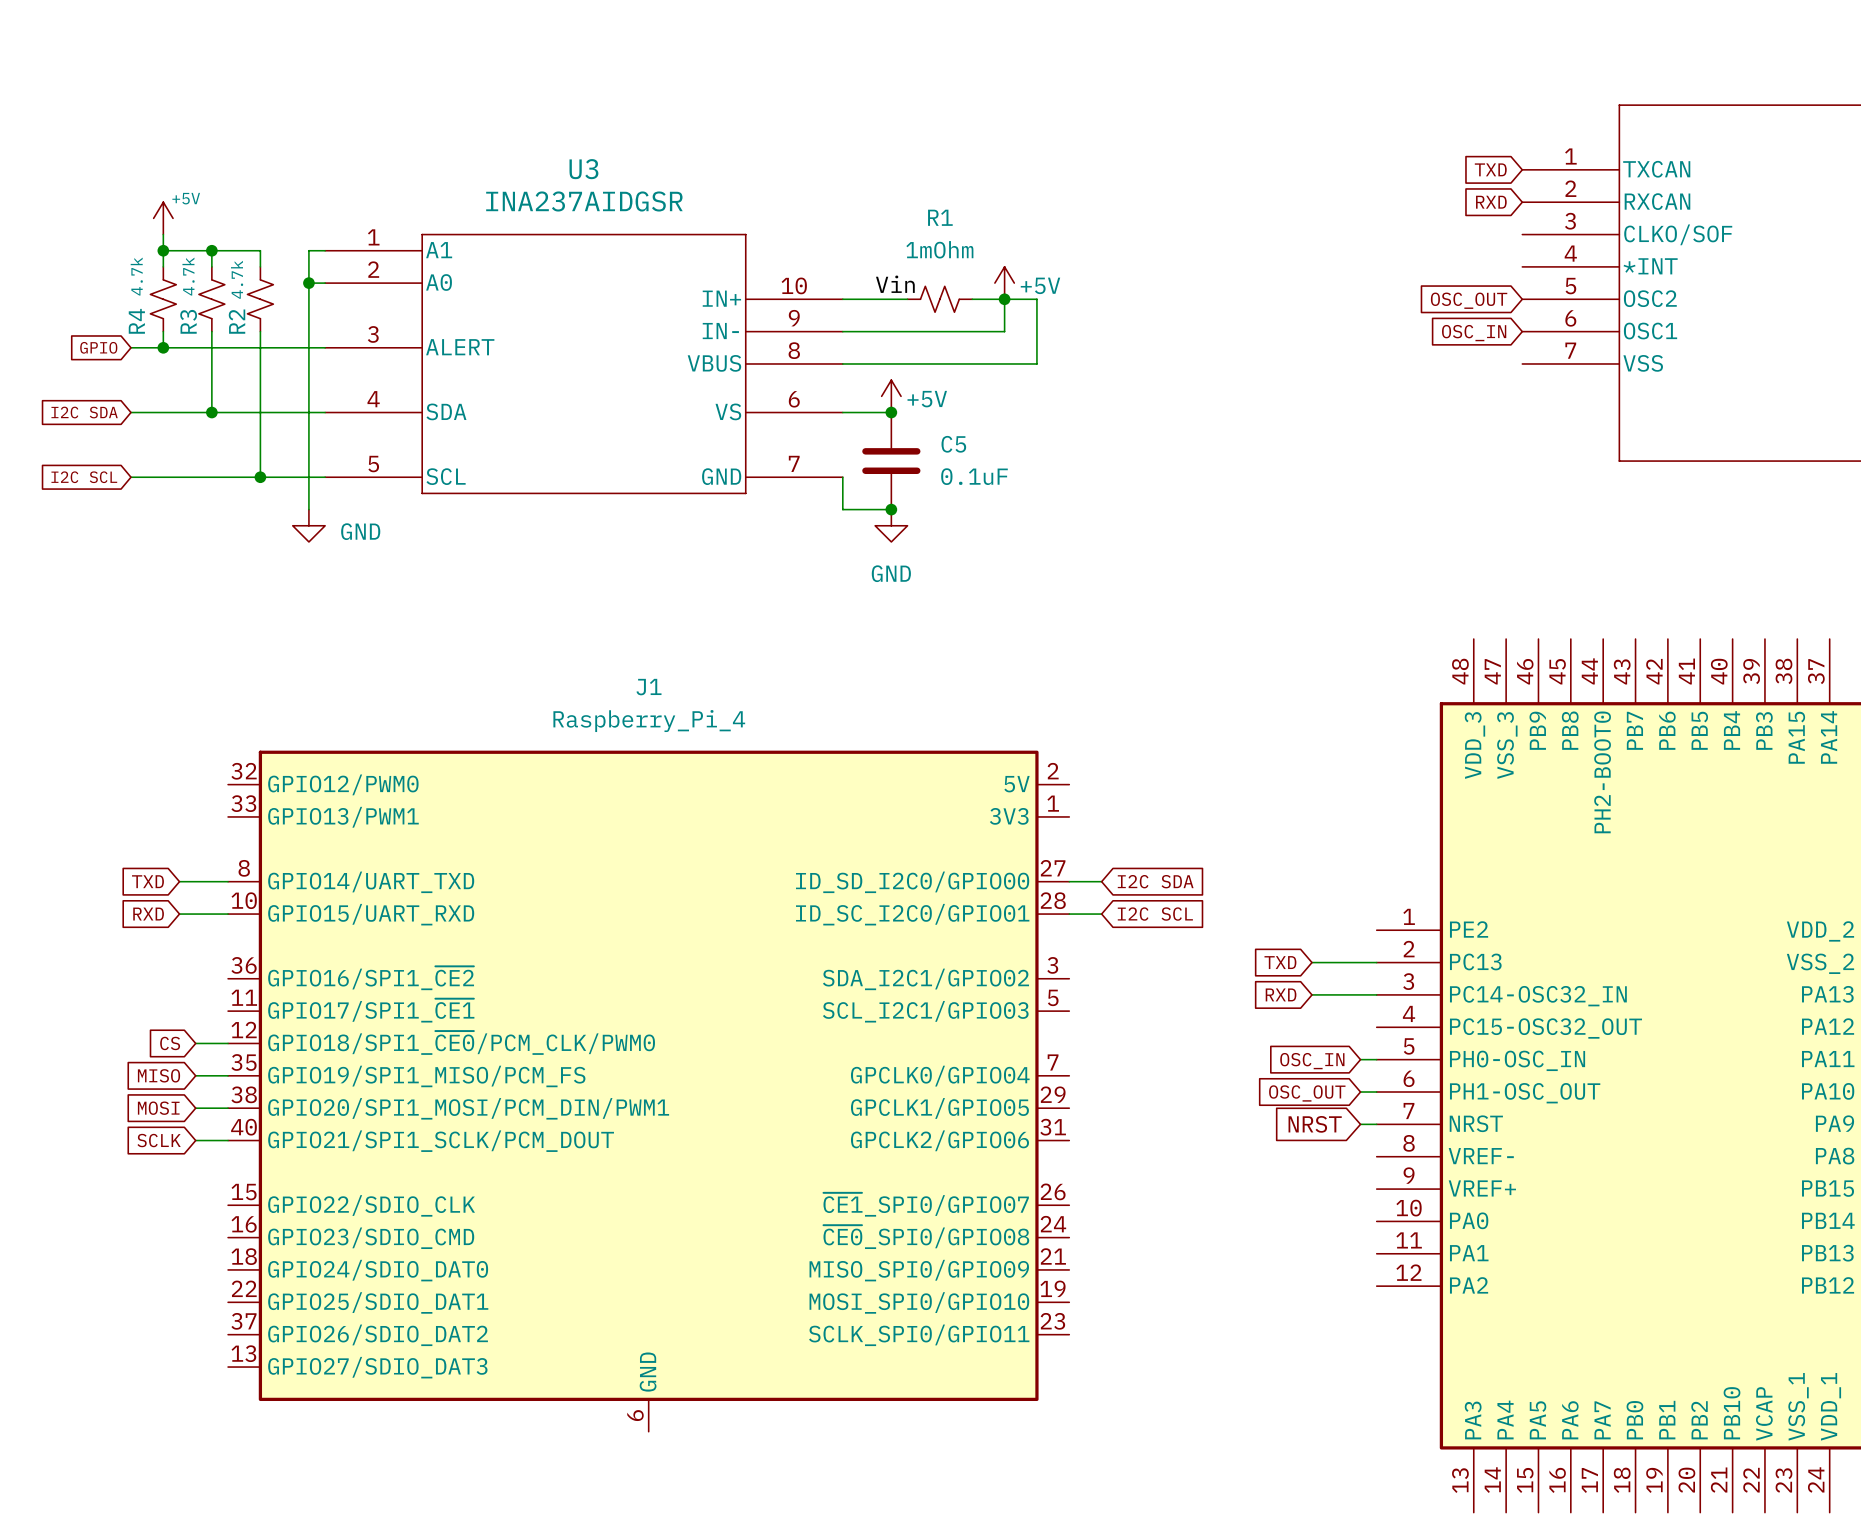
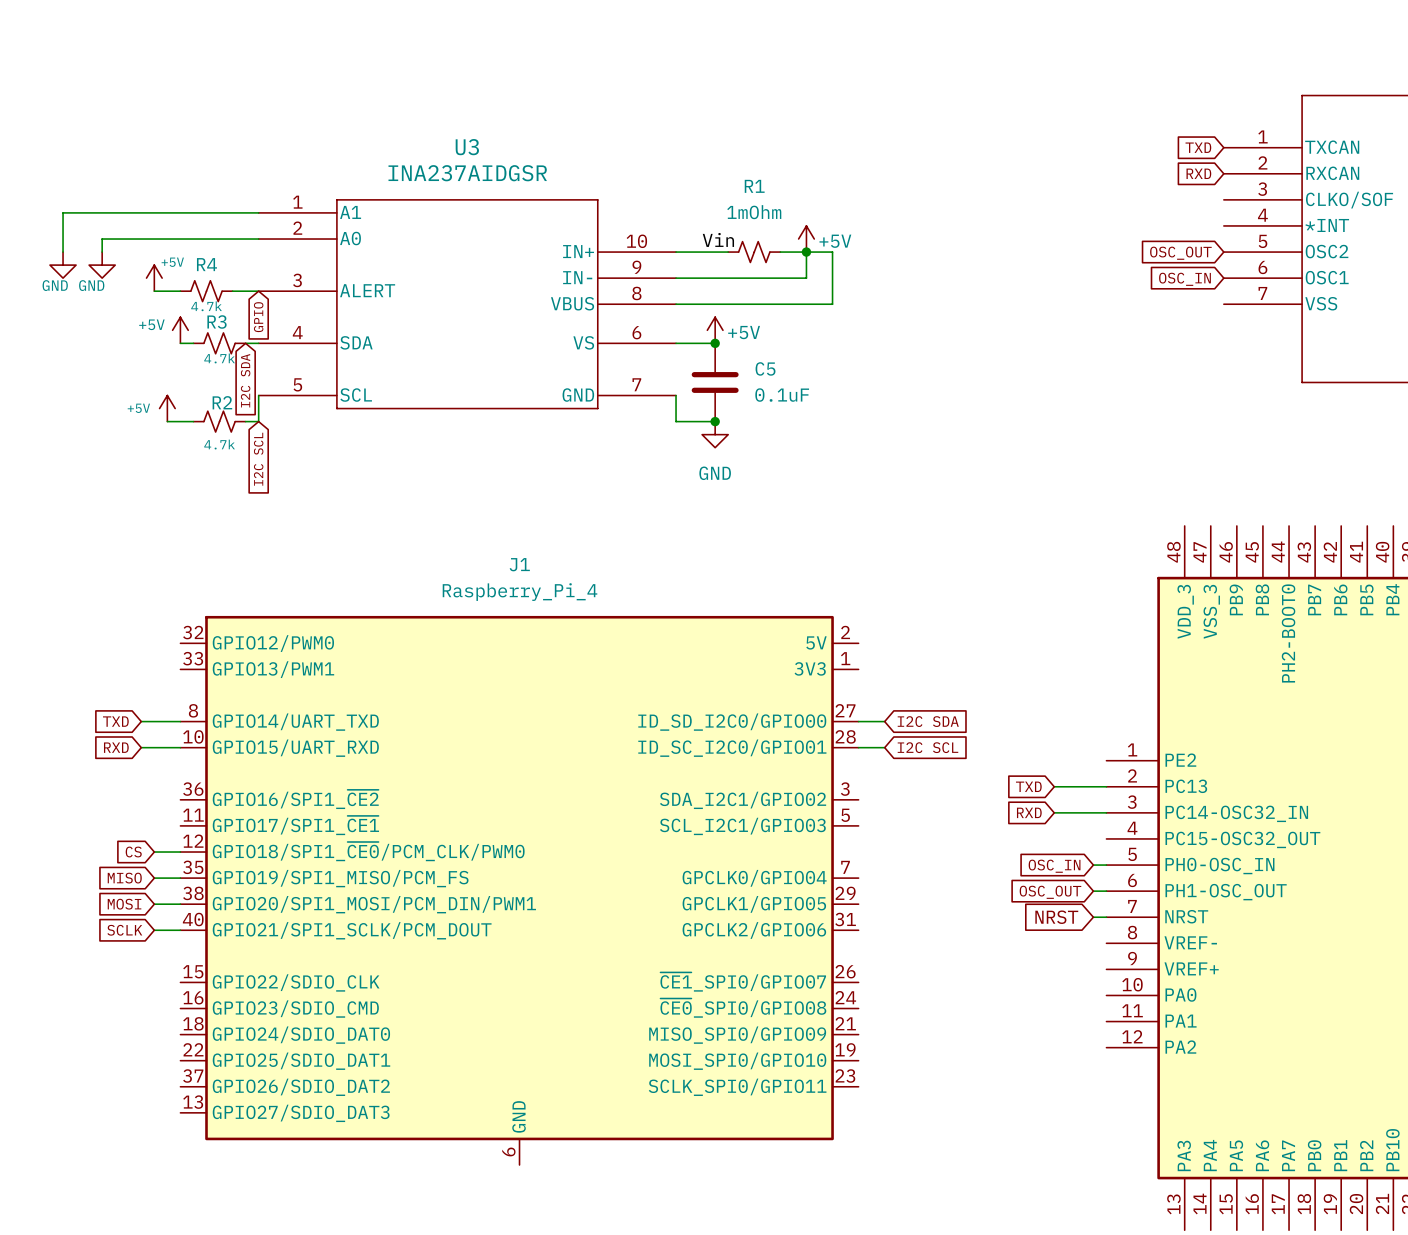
power symbol: +5V (163, 218) -> none
wire: (163, 234) (163, 266) -> none
wire: none -> (128, 212) (63, 212) (63, 252)
junction: (163, 250) -> none
wire: (211, 250) (211, 266) -> none
junction: (211, 250) -> none
wire: (260, 250) (260, 266) -> (206, 212) (245, 212)
wire: (308, 250) (308, 509) -> none
R4 value position: 4.7k (136, 276) -> 4.7k (206, 306)
R3 value position: 4.7k (188, 276) -> 4.7k (219, 358)
R2 value position: 4.7k (237, 279) -> 4.7k (219, 444)
wire: none -> (245, 239) (102, 239) (102, 252)
junction: (308, 283) -> none
R4 rotation: 0° (163, 299) -> 90° clockwise (206, 291)
R4 position: (163, 299) -> (206, 291)
R3 rotation: 0° (211, 299) -> 90° clockwise (219, 343)
R3 position: (211, 299) -> (219, 343)
R2 rotation: 0° (260, 299) -> 90° clockwise (219, 421)
R2 position: (260, 299) -> (219, 421)
power symbol: none -> GND (63, 265)
power symbol: none -> GND (102, 265)
R2 name position: R2 (237, 321) -> R2 (222, 402)
wire: (163, 331) (163, 347) -> none
power symbol: none -> +5V (154, 278)
wire: (211, 331) (211, 412) -> none
wire: (260, 331) (260, 477) -> none
global label rotation: 0° (98, 347) -> 90° counterclockwise (258, 317)
global label position: GPIO (98, 347) -> GPIO (258, 317)
wire: (130, 347) (195, 347) -> none
junction: (163, 347) -> none
power symbol: none -> +5V (180, 330)
global label rotation: 0° (84, 412) -> 90° counterclockwise (245, 380)
global label position: I2C SDA (84, 412) -> I2C SDA (245, 380)
wire: (130, 412) (228, 412) -> none
junction: (211, 412) -> none
global label rotation: 0° (84, 477) -> 90° counterclockwise (258, 459)
global label position: I2C SCL (84, 477) -> I2C SCL (258, 459)
wire: (130, 477) (325, 477) -> (245, 421) (258, 421) (258, 395)
junction: (260, 477) -> none
power symbol: none -> +5V (167, 408)
wire: none -> (167, 421) (193, 421)
power symbol: GND (308, 525) -> none

